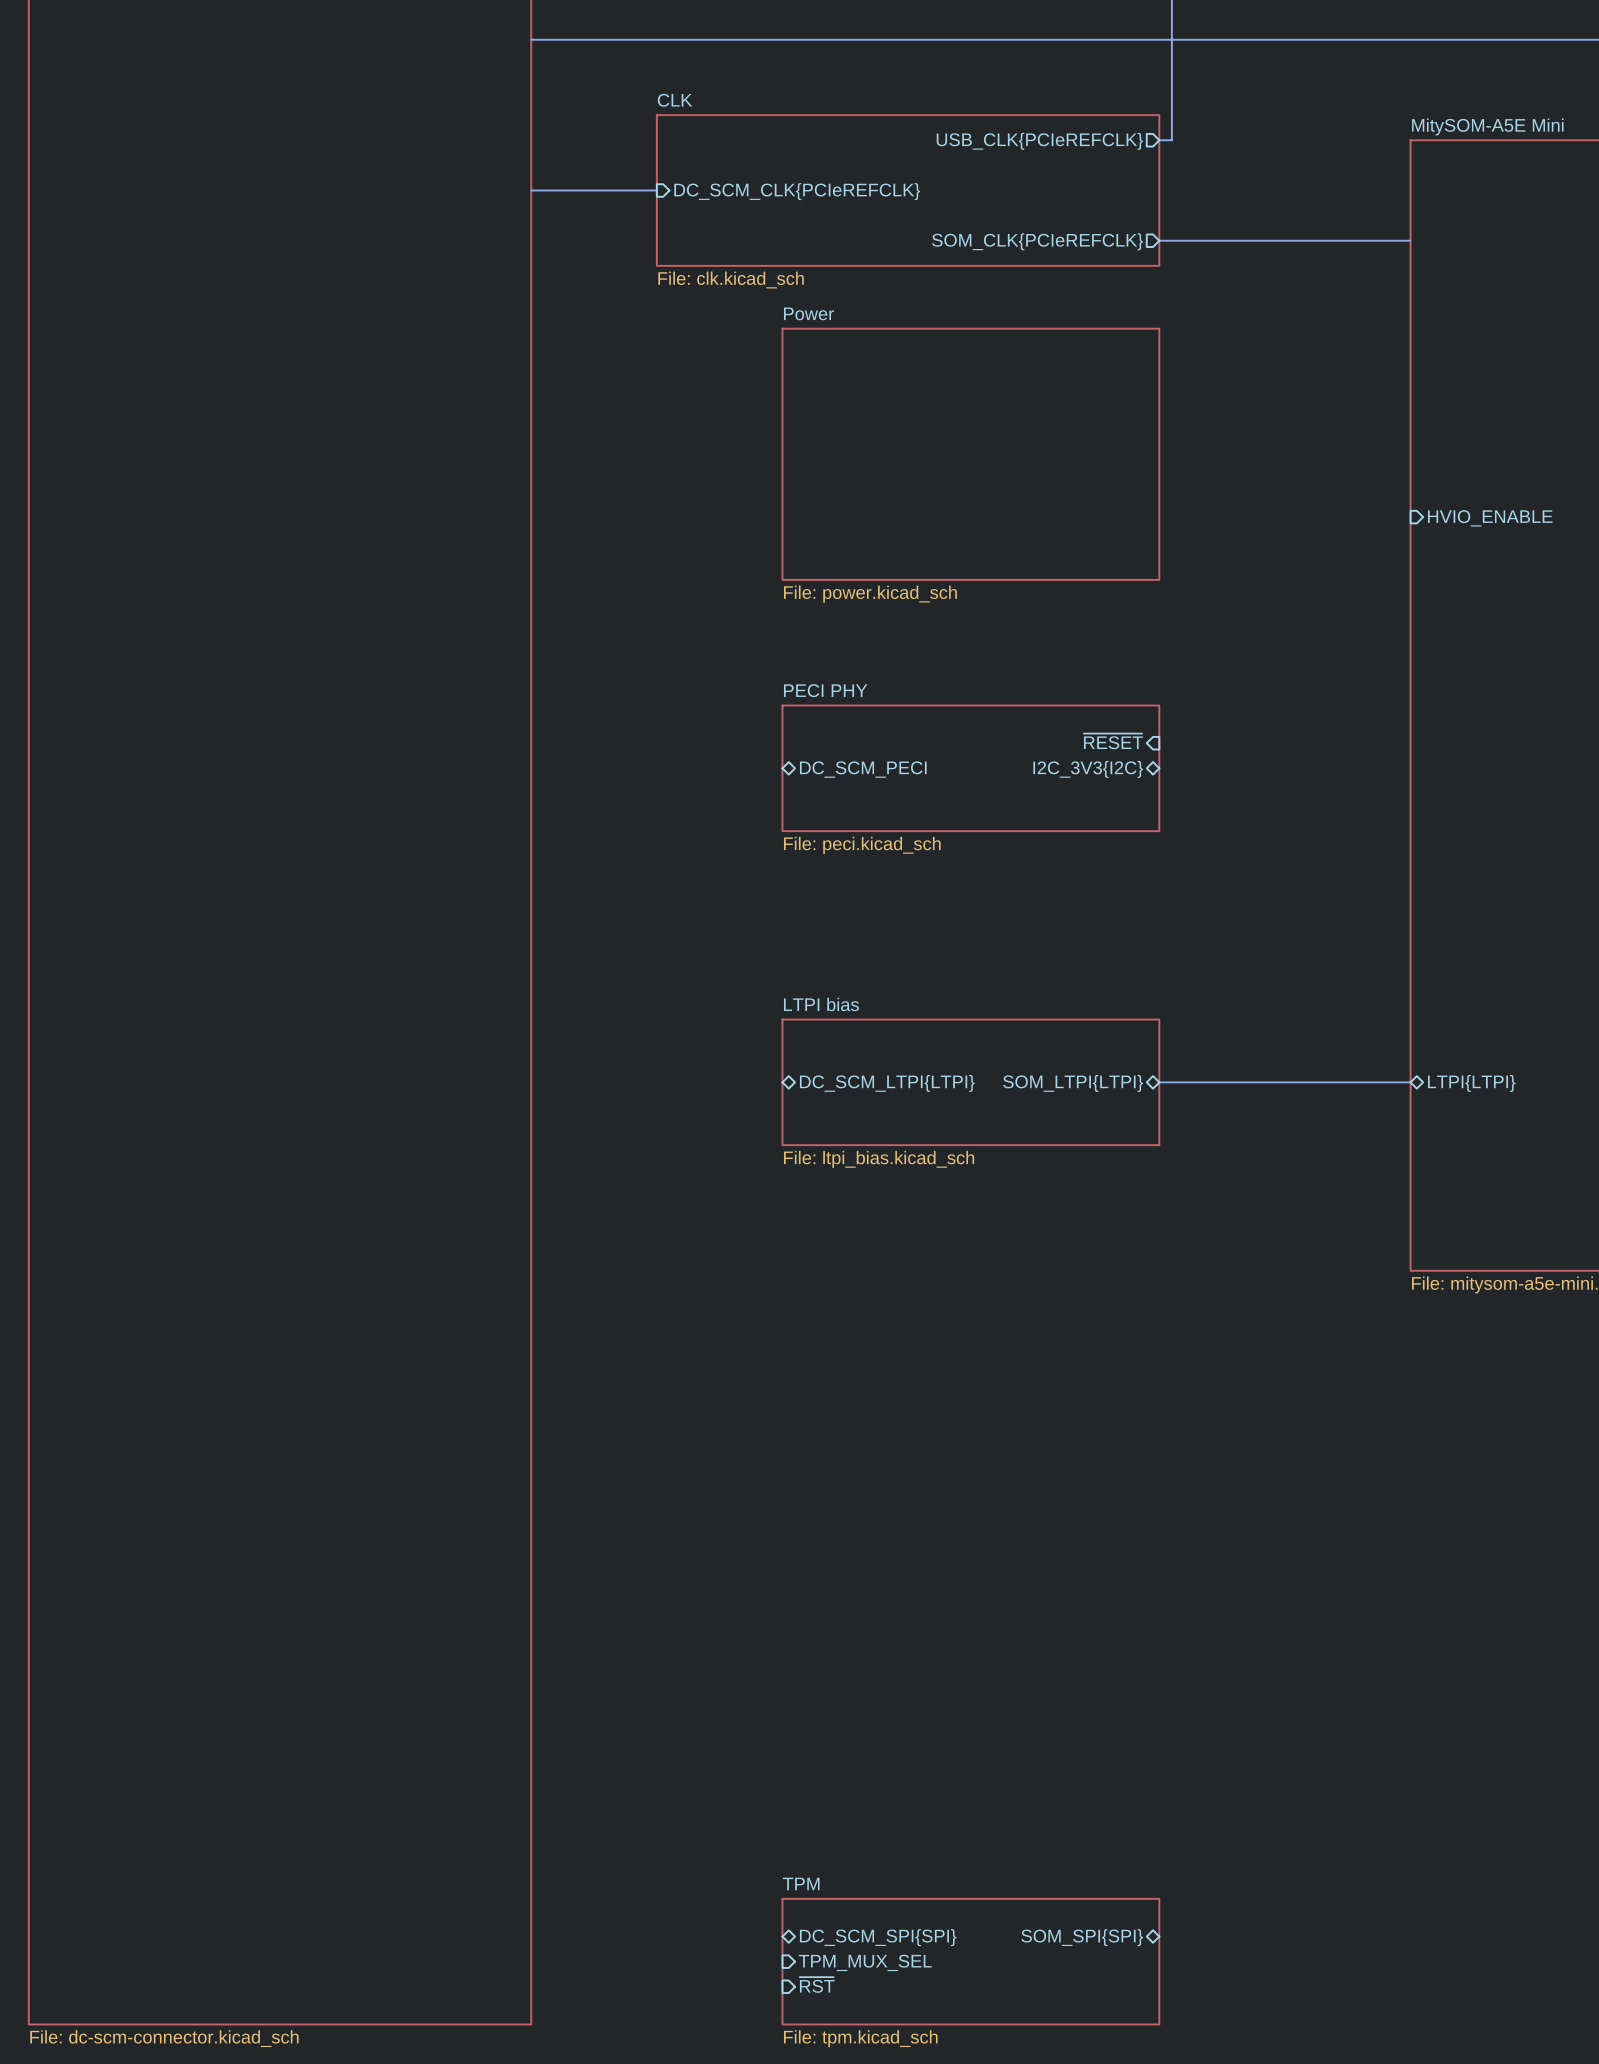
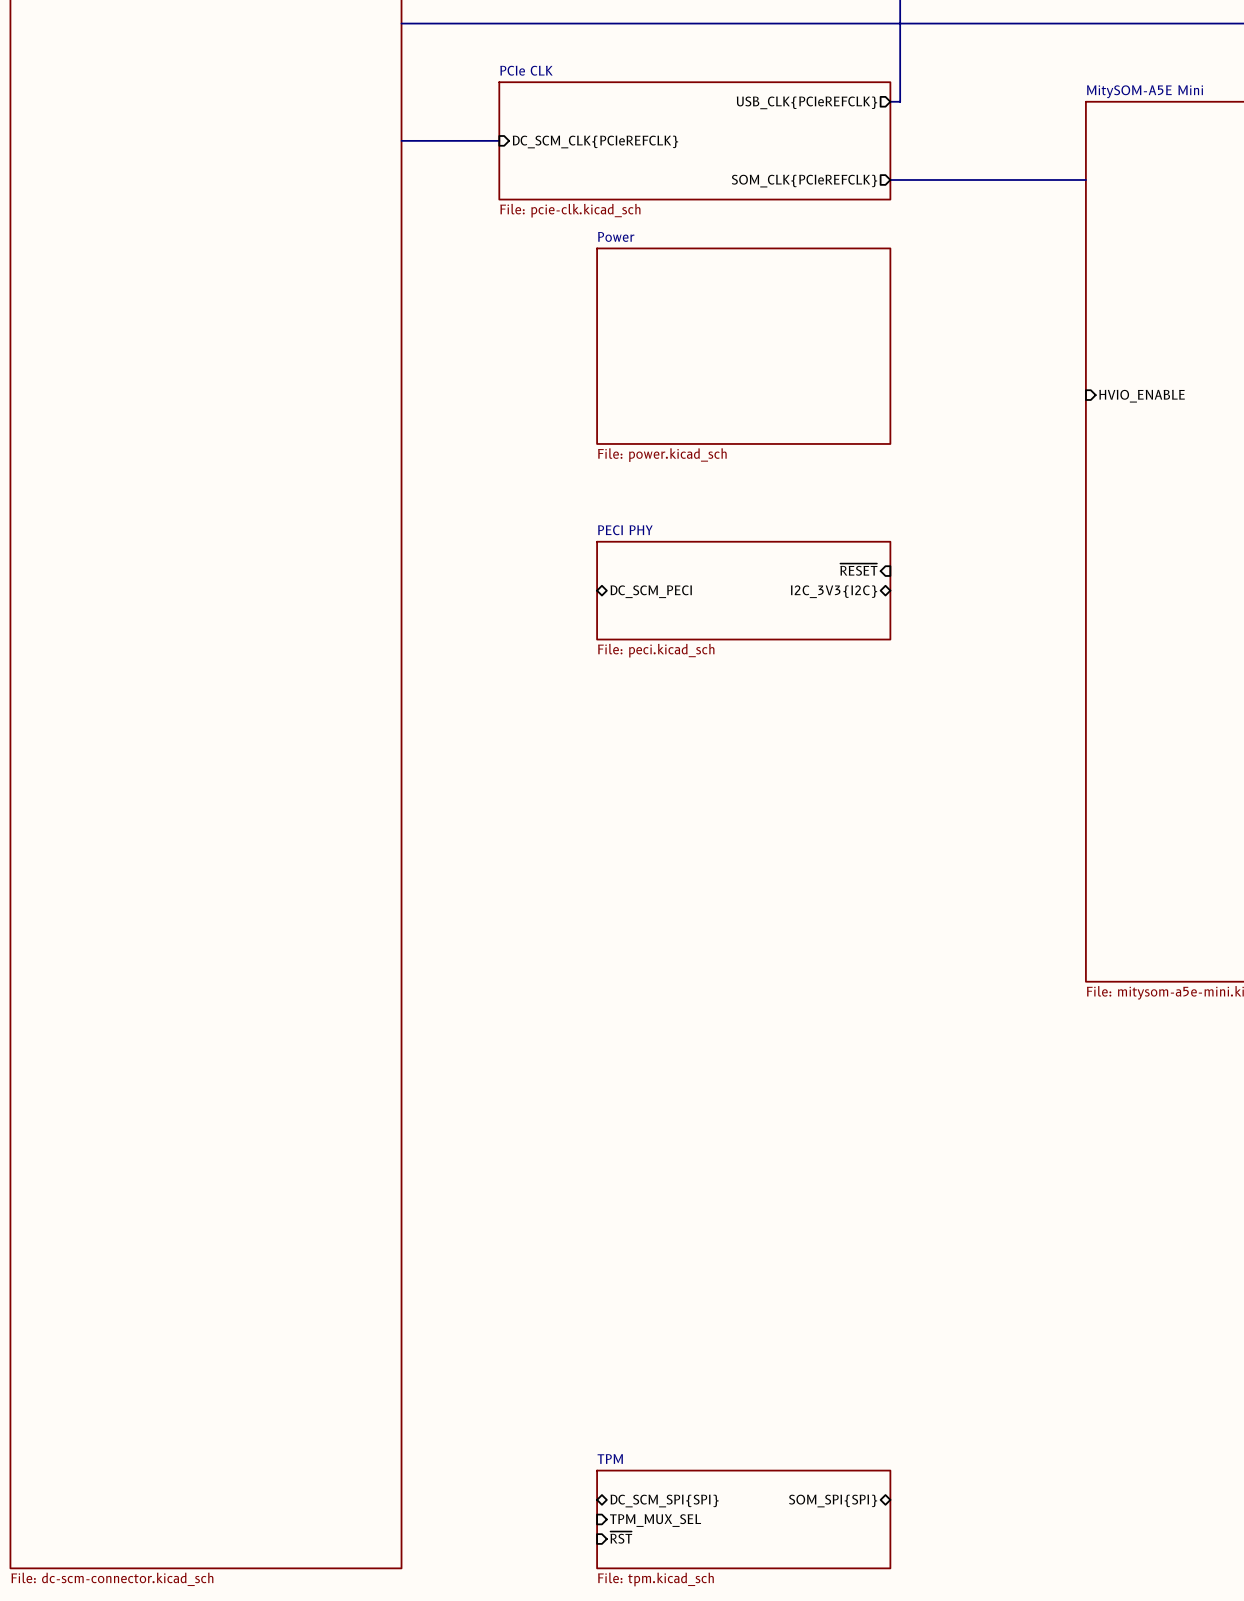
sheet CLK name: CLK (674, 100) -> PCIe CLK (526, 70)
sheet CLK value: File: clk.kicad_sch (731, 280) -> File: pcie-clk.kicad_sch (570, 210)
sheet LTPI bias: File: ltpi_bias.kicad_sch (970, 1082) -> none
bus: (1159, 1082) (1410, 1082) -> none
sheet pin: DC_SCM_LTPI{LTPI} (887, 1083) -> none
sheet pin: SOM_LTPI{LTPI} (1073, 1083) -> none
sheet pin: LTPI{LTPI} (1471, 1083) -> none

